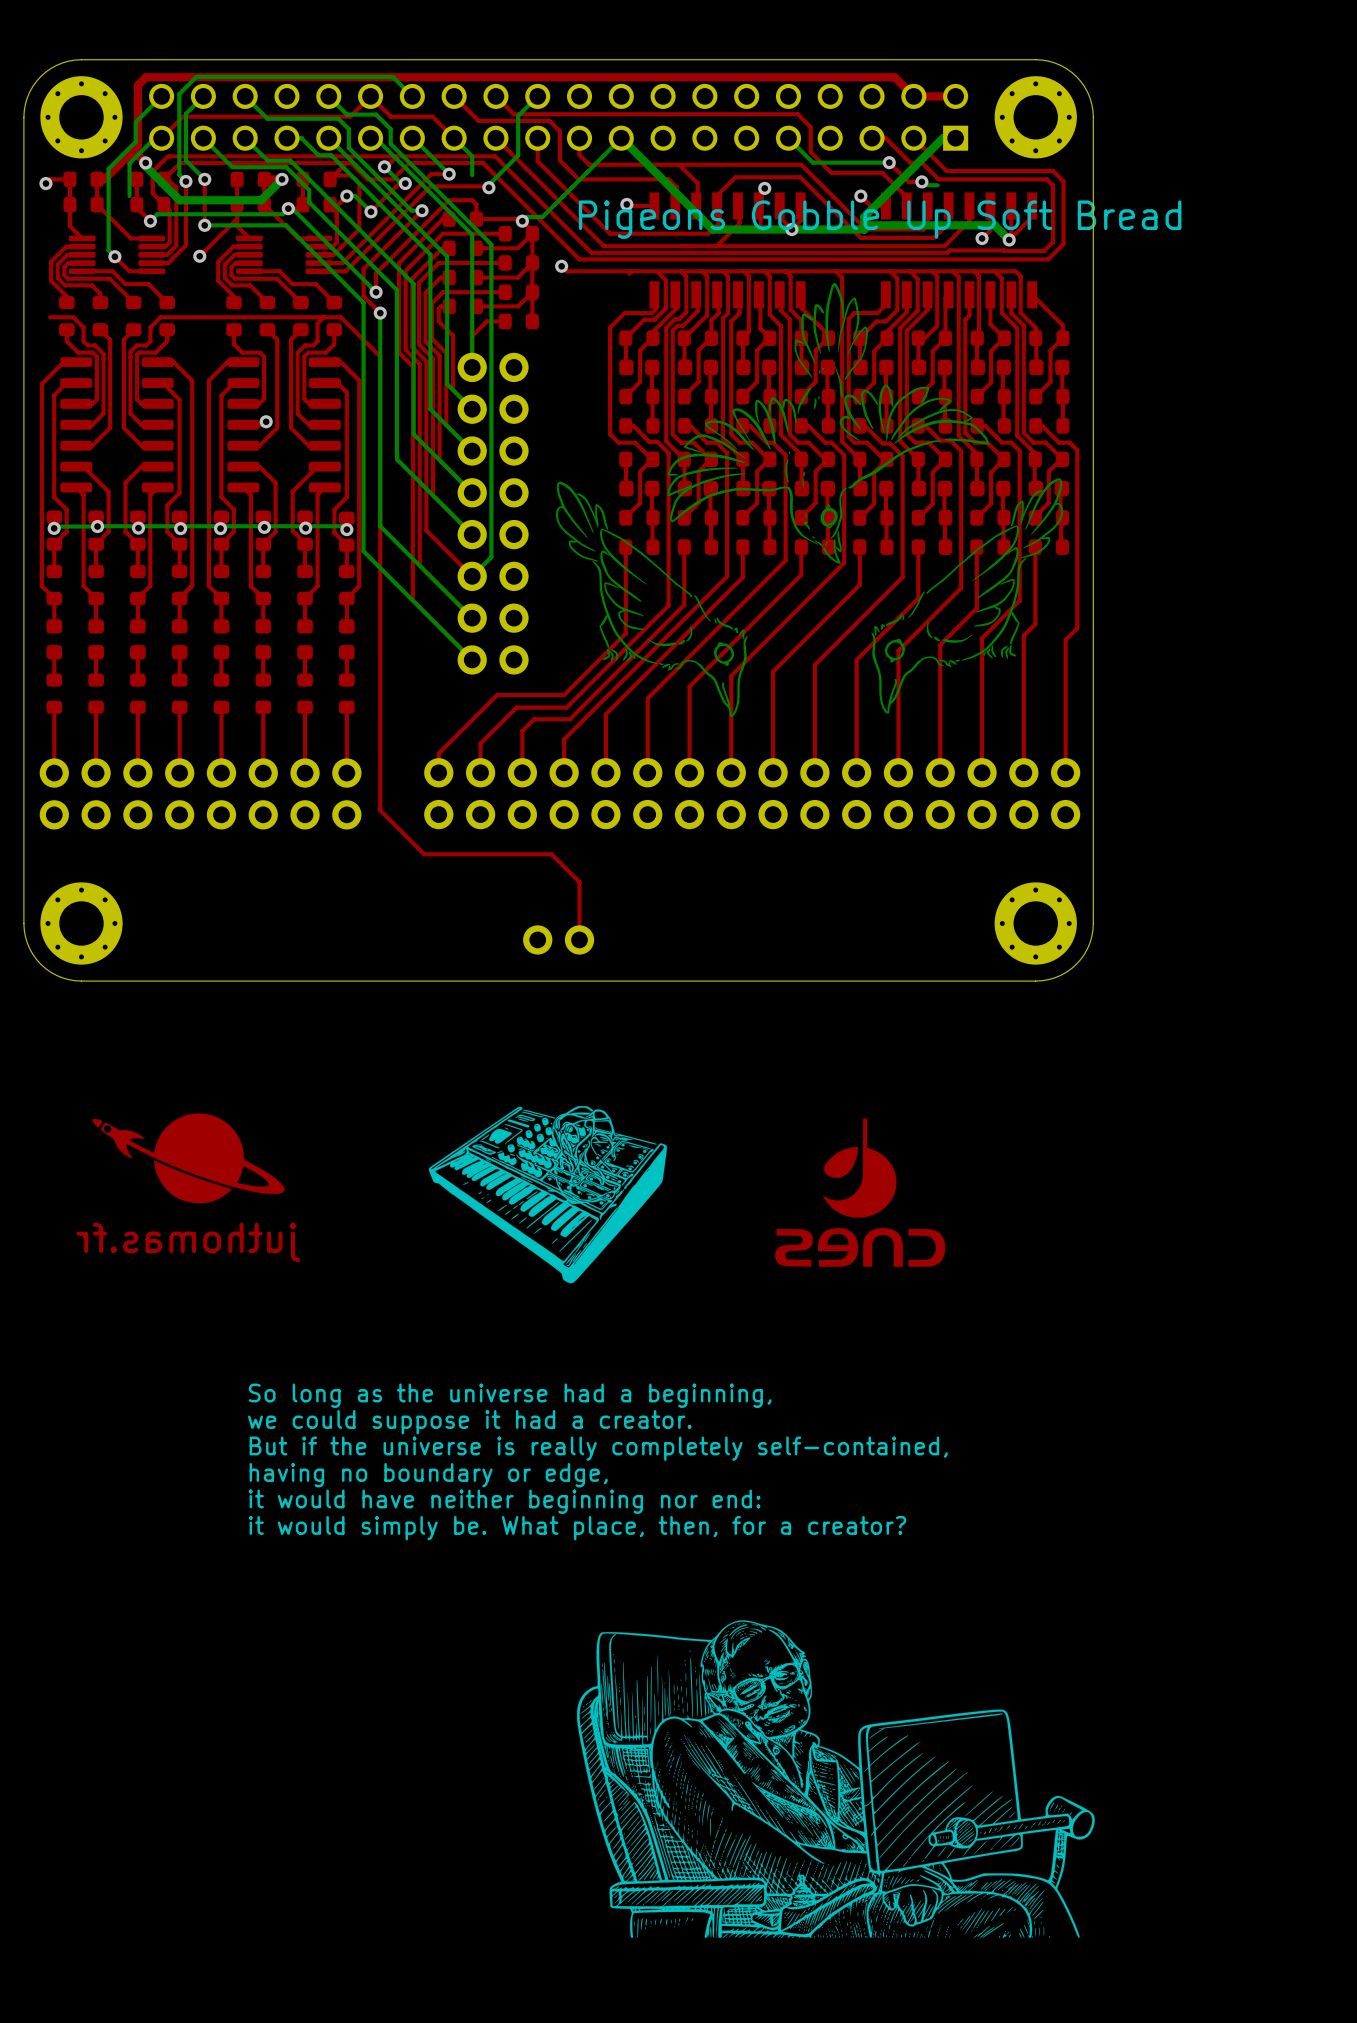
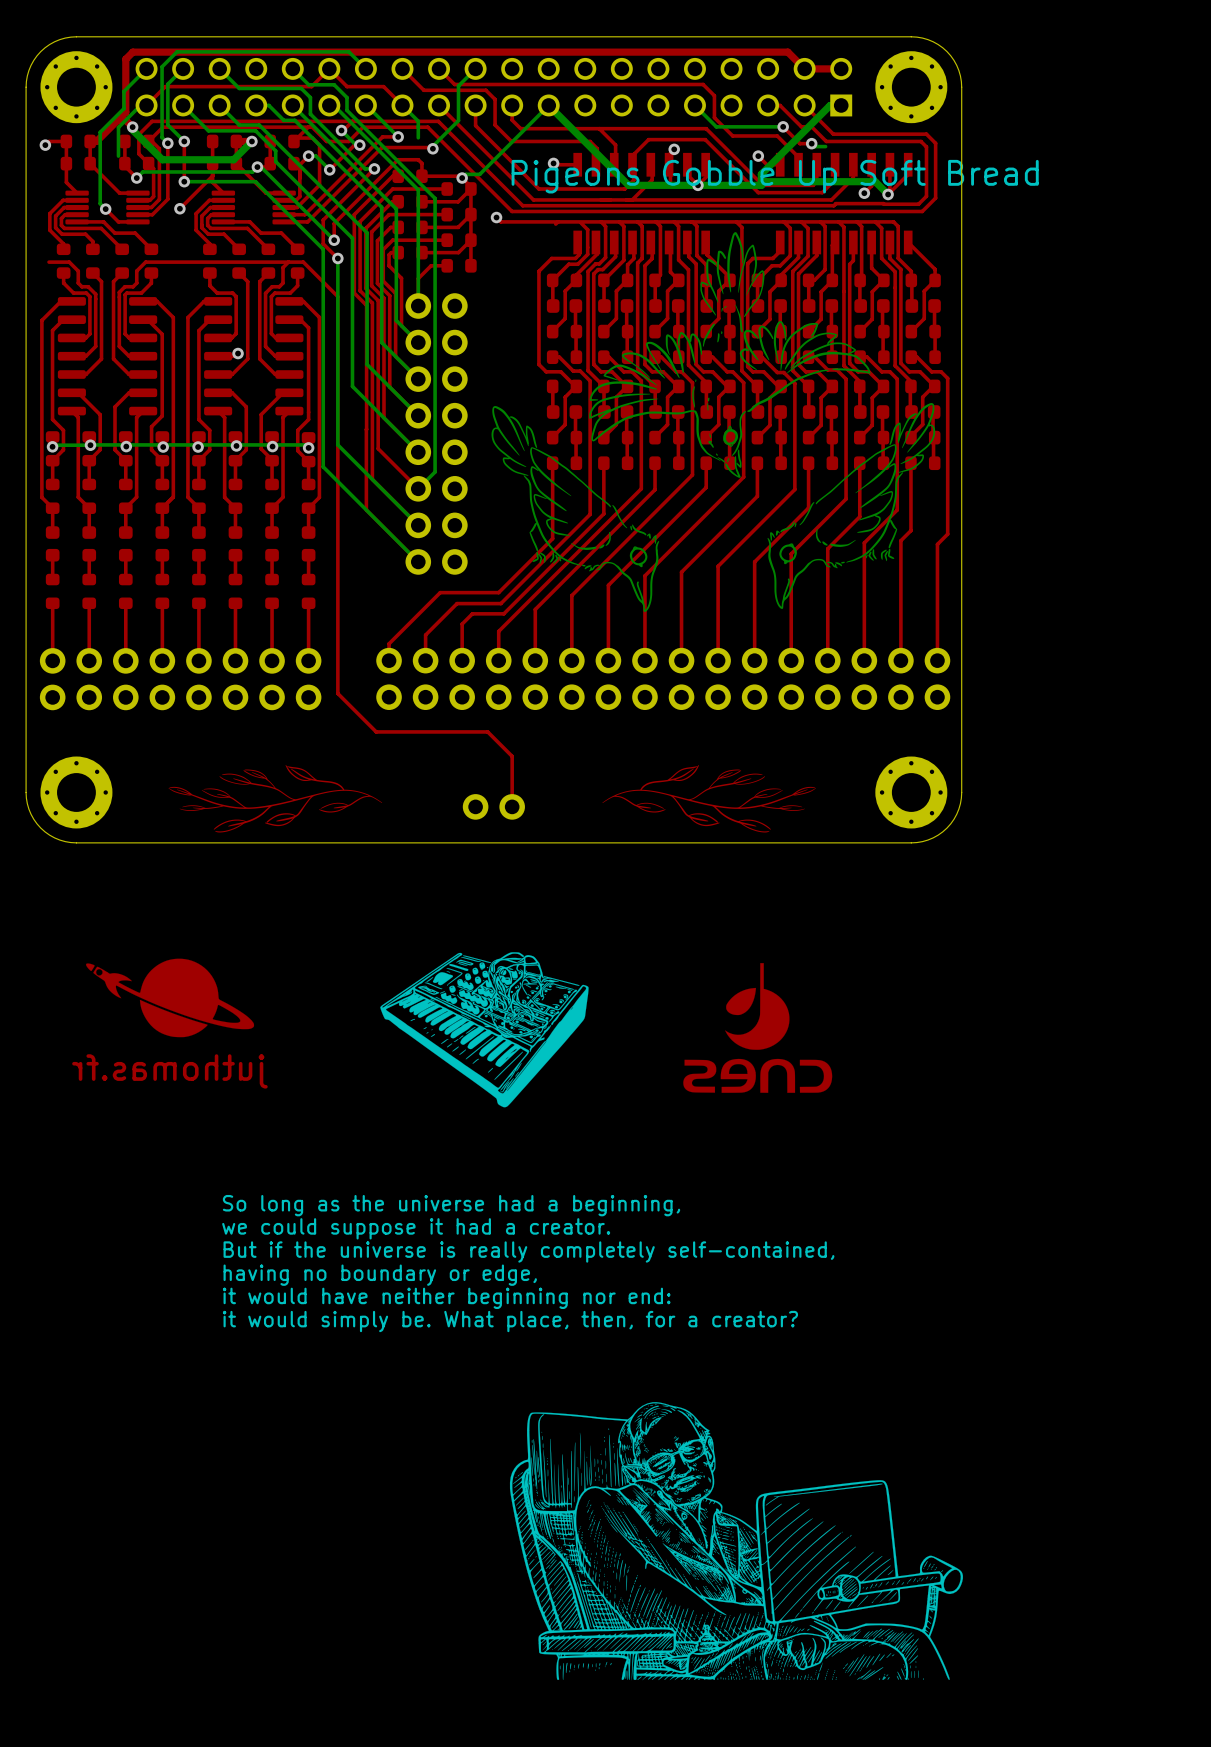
drawing: none -> [168, 765, 383, 833]
drawing: none -> [602, 765, 817, 833]

